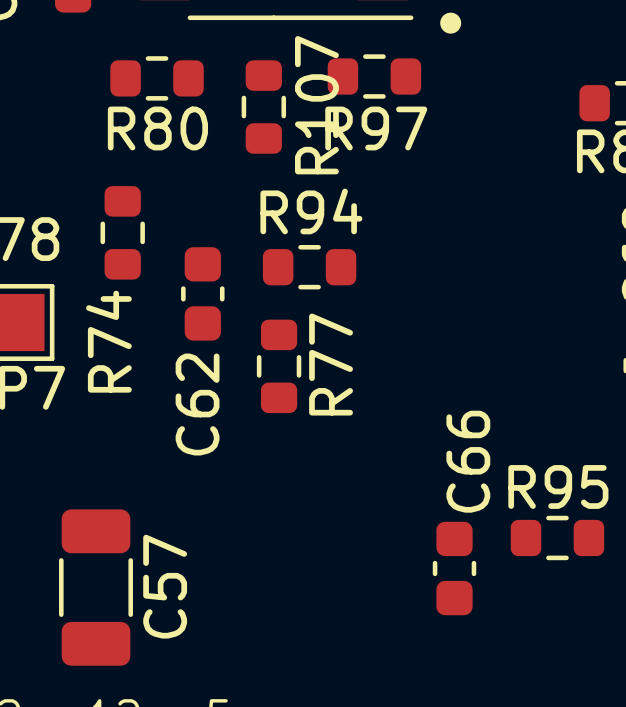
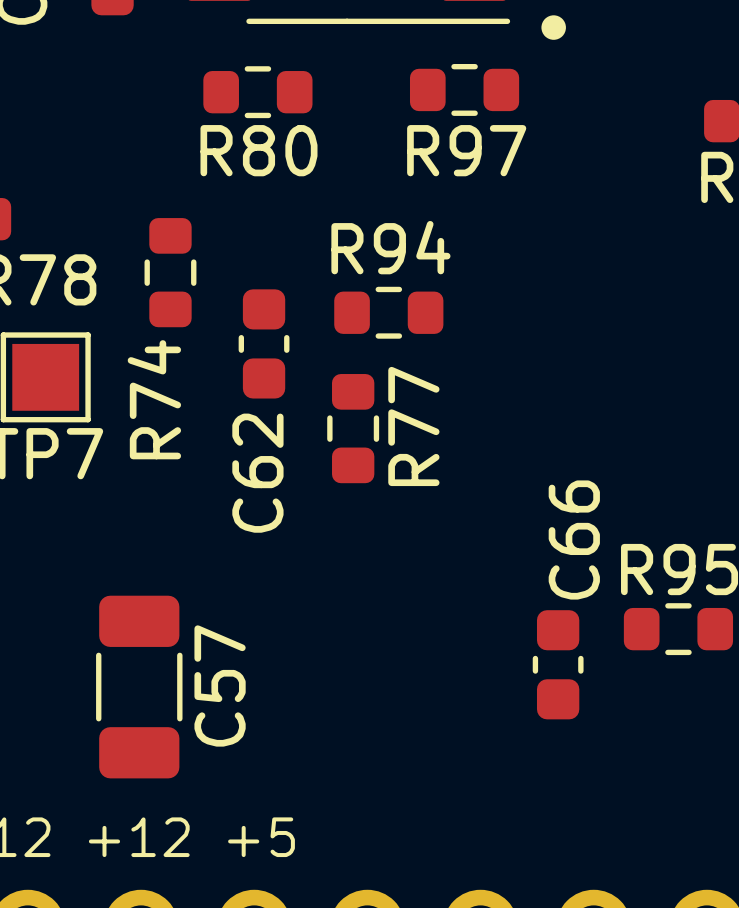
R80 position: (157, 78) -> (257, 92)
R107: (263, 107) -> none

